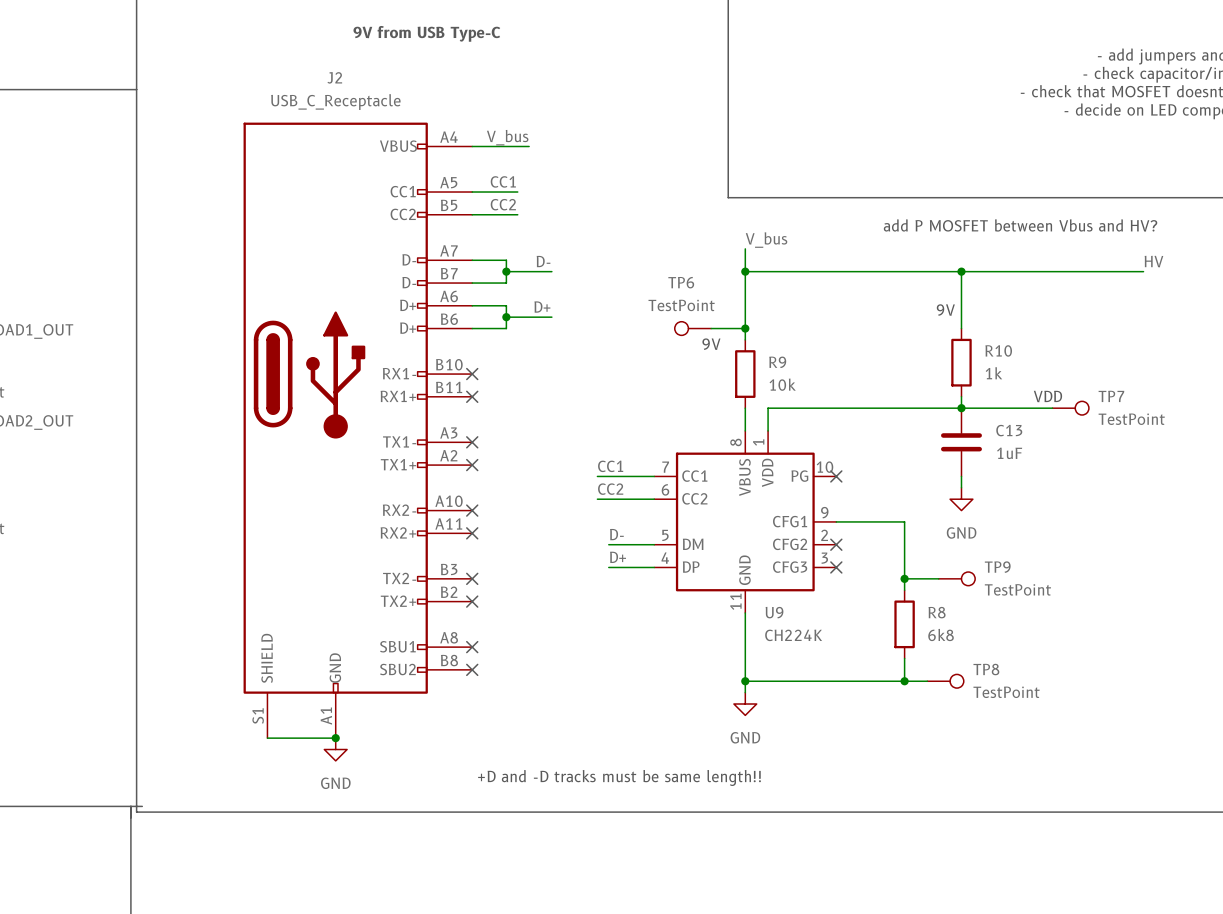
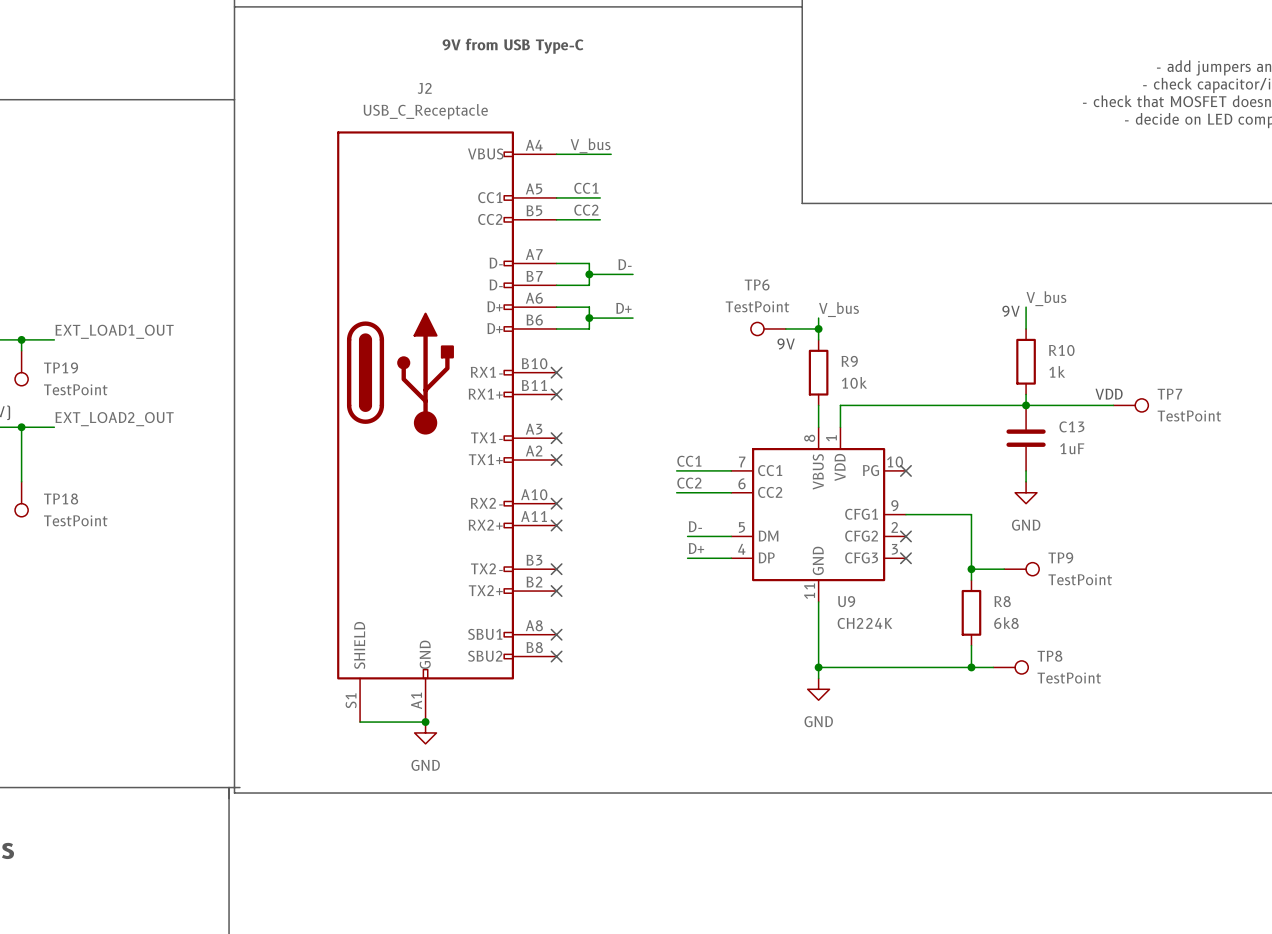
text: add P MOSFET between Vbus and HV? (1020, 225) -> none
label position: V_bus (766, 240) -> V_bus (838, 309)
wire: (745, 248) (745, 317) -> none
label: HV (1153, 261) -> none
wire: (745, 271) (1143, 271) -> none
junction: (745, 271) -> none
wire: (961, 271) (961, 305) -> none
junction: (961, 271) -> none
label: none -> V_bus (1046, 298)
text: +D and -D tracks must be same length!! (619, 777) -> none

